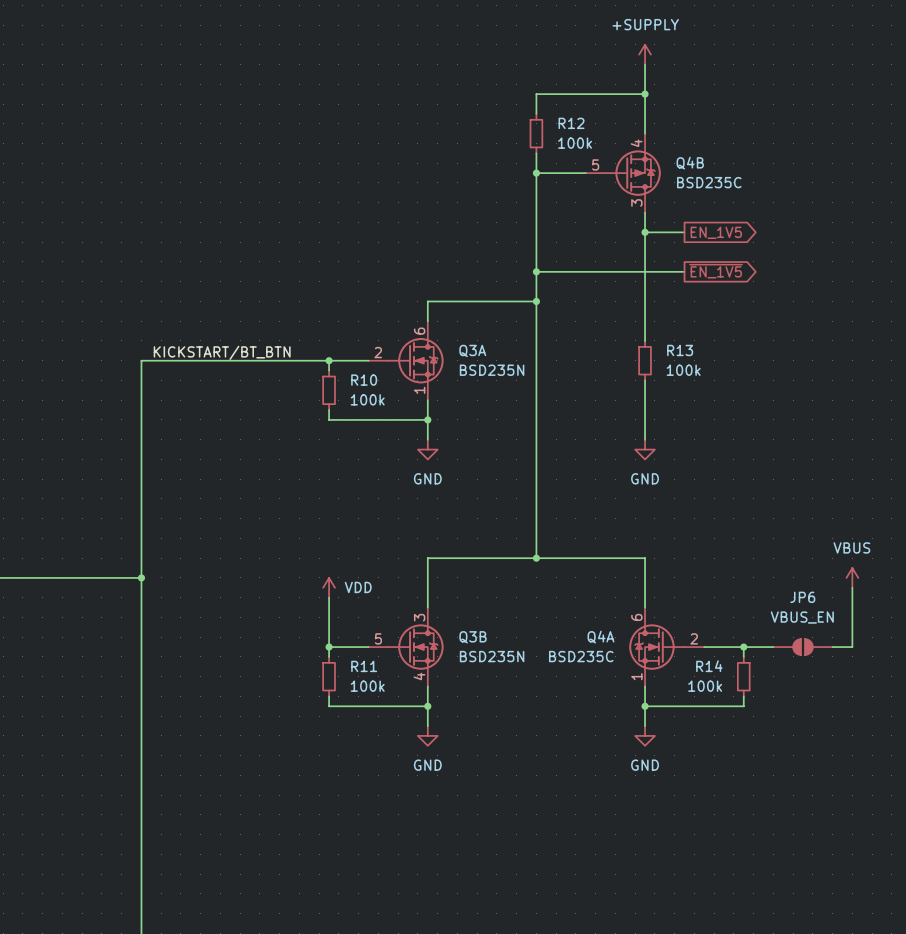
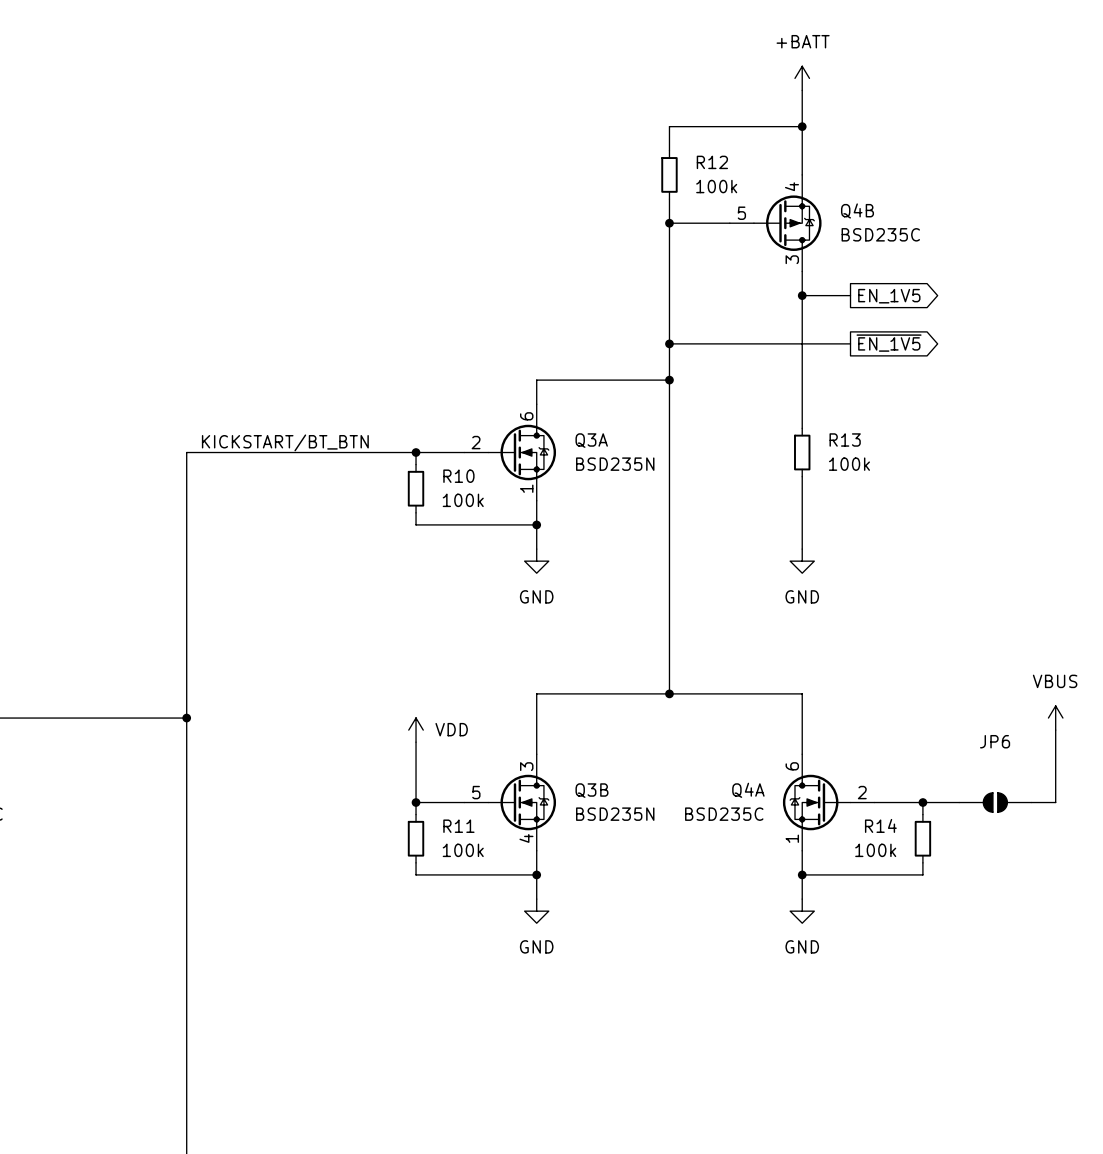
power symbol: +SUPPLY (645, 54) -> +BATT (802, 78)
JP6 value: VBUS_EN (802, 617) -> none

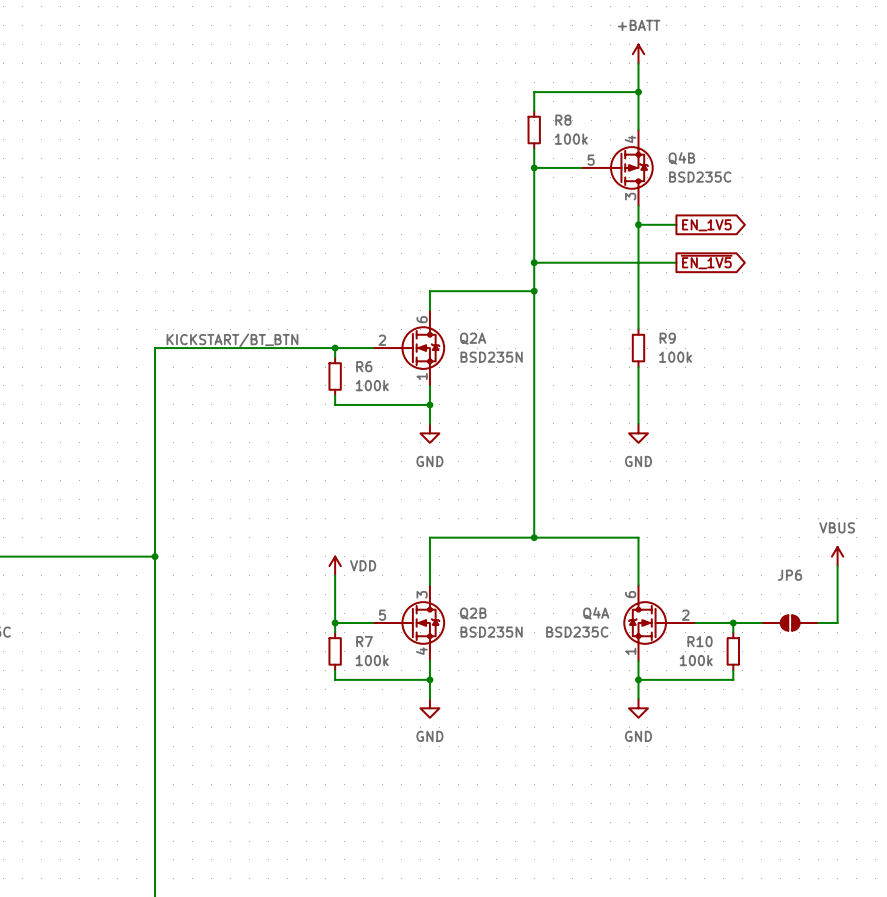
R12 name: R12 (712, 162) -> R8 (563, 120)
R13 name: R13 (845, 439) -> R9 (667, 338)
Q3A name: Q3A (591, 440) -> Q2A (473, 338)
R10 name: R10 (458, 476) -> R6 (364, 366)
Q3B name: Q3B (591, 790) -> Q2B (473, 613)
R14 name: R14 (880, 825) -> R10 (700, 641)
R11 name: R11 (458, 826) -> R7 (364, 641)

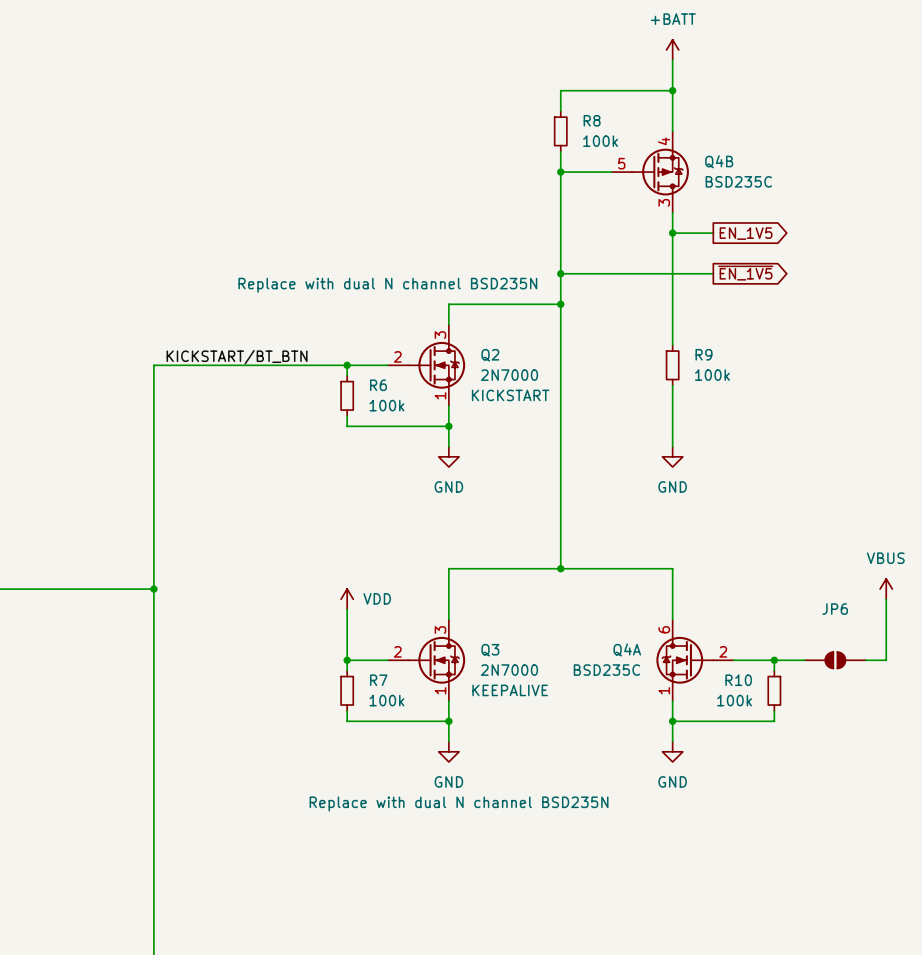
Q2A: BSD235N (409, 348) -> none
Q2: none -> 2N7000 (426, 365)
Q2B: BSD235N (409, 622) -> none
Q3: none -> 2N7000 (426, 660)

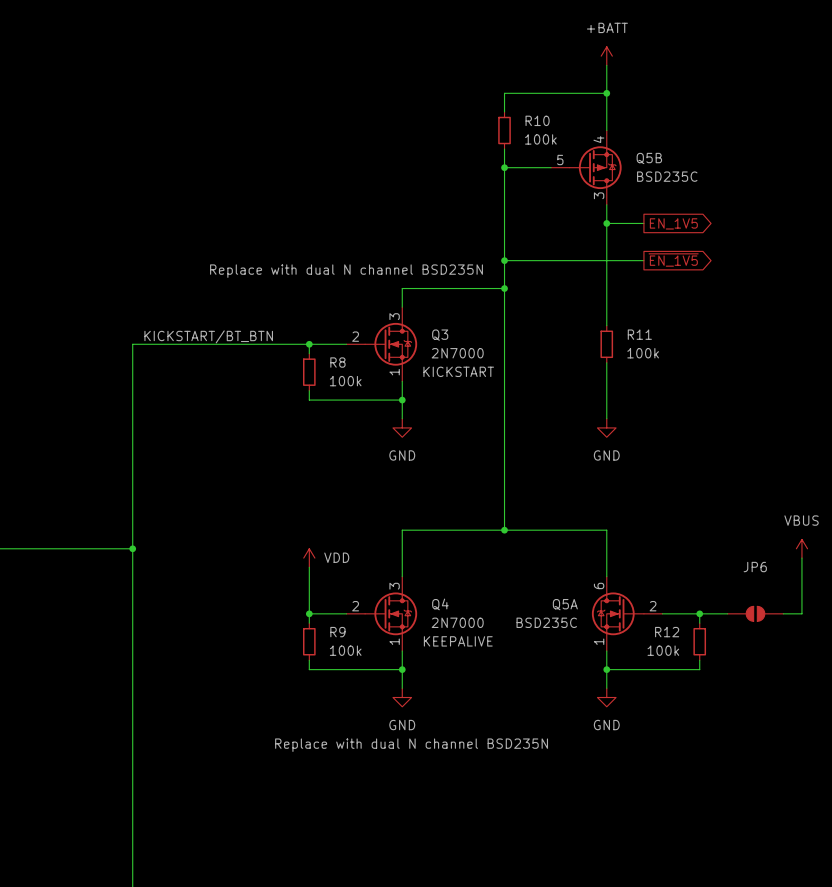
R8 name: R8 (592, 120) -> R10 (537, 120)
Q4B name: Q4B (719, 161) -> Q5B (649, 158)
R9 name: R9 (703, 354) -> R11 (639, 334)
Q2 name: Q2 (490, 355) -> Q3 (440, 335)
R6 name: R6 (378, 385) -> R8 (337, 362)
Q4A name: Q4A (627, 649) -> Q5A (565, 604)
Q3 name: Q3 (490, 650) -> Q4 (440, 604)
R7 name: R7 (378, 680) -> R9 (337, 632)
R10 name: R10 (738, 680) -> R12 (667, 632)

